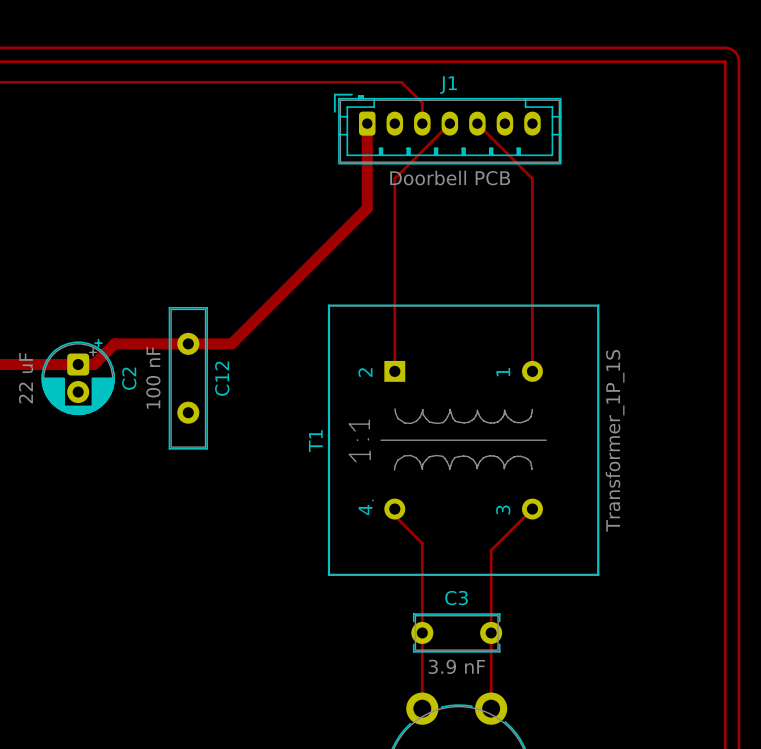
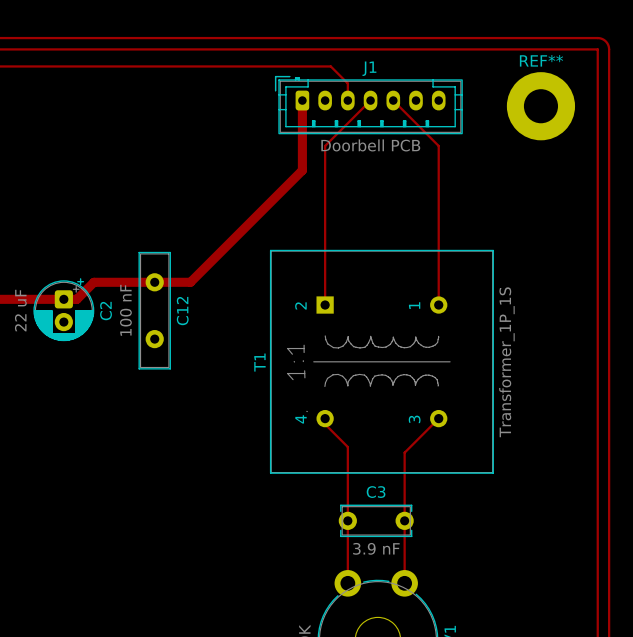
REF**: none -> (540, 106)

